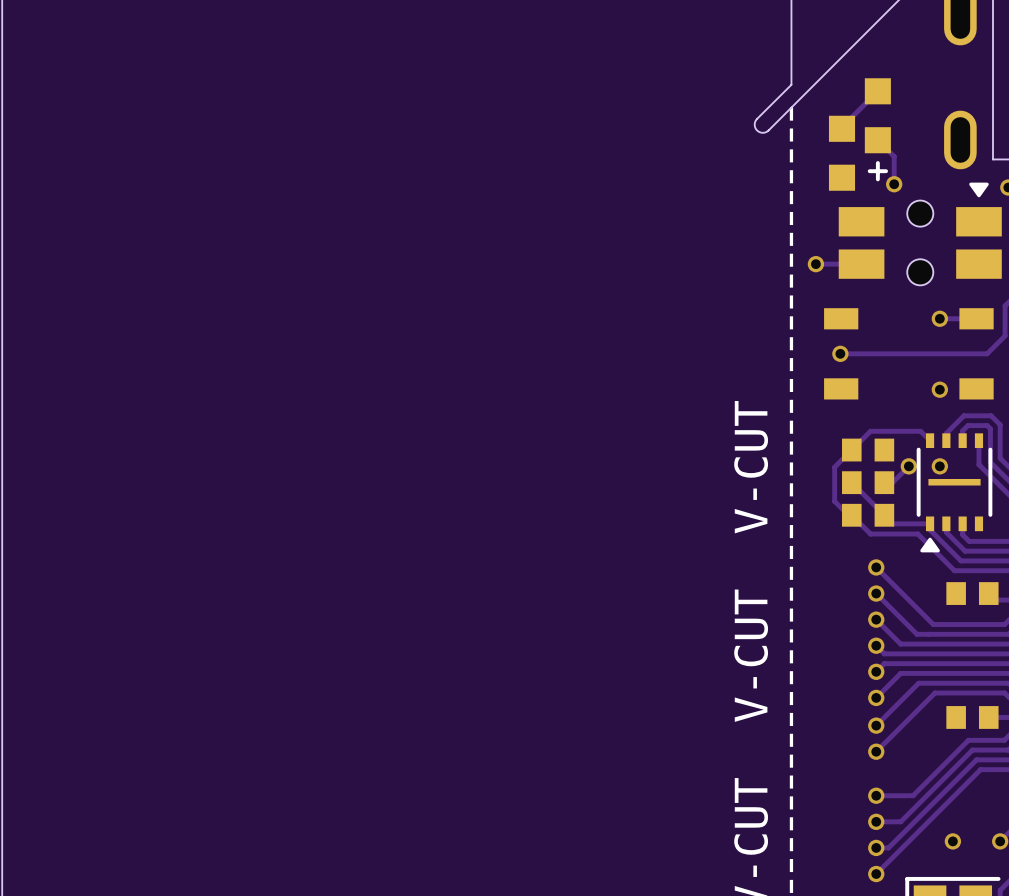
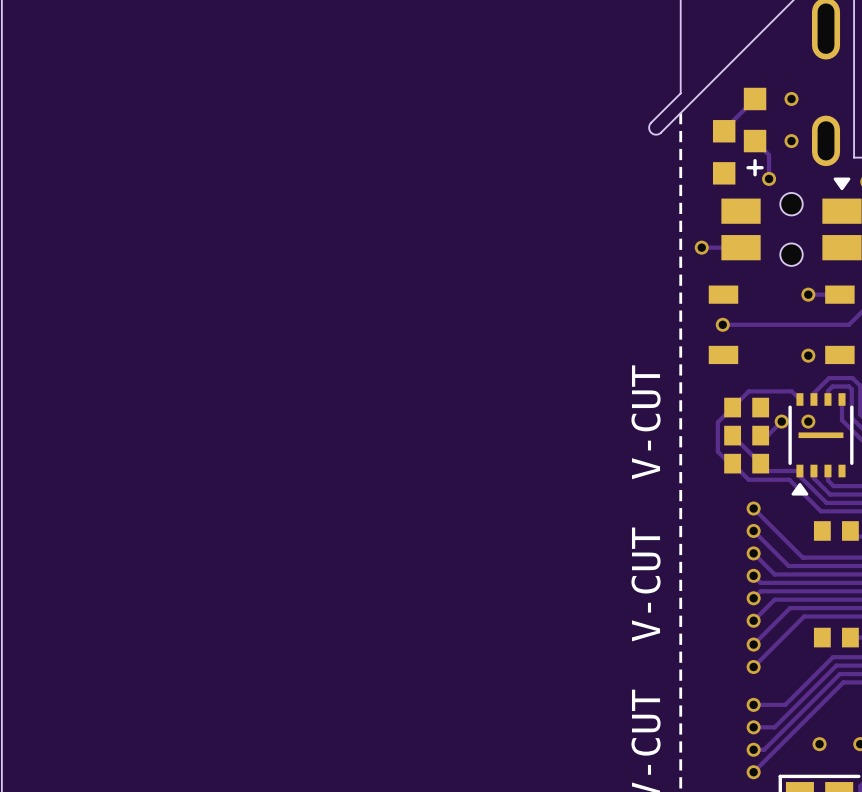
via: none -> (791, 98)
via: none -> (791, 141)

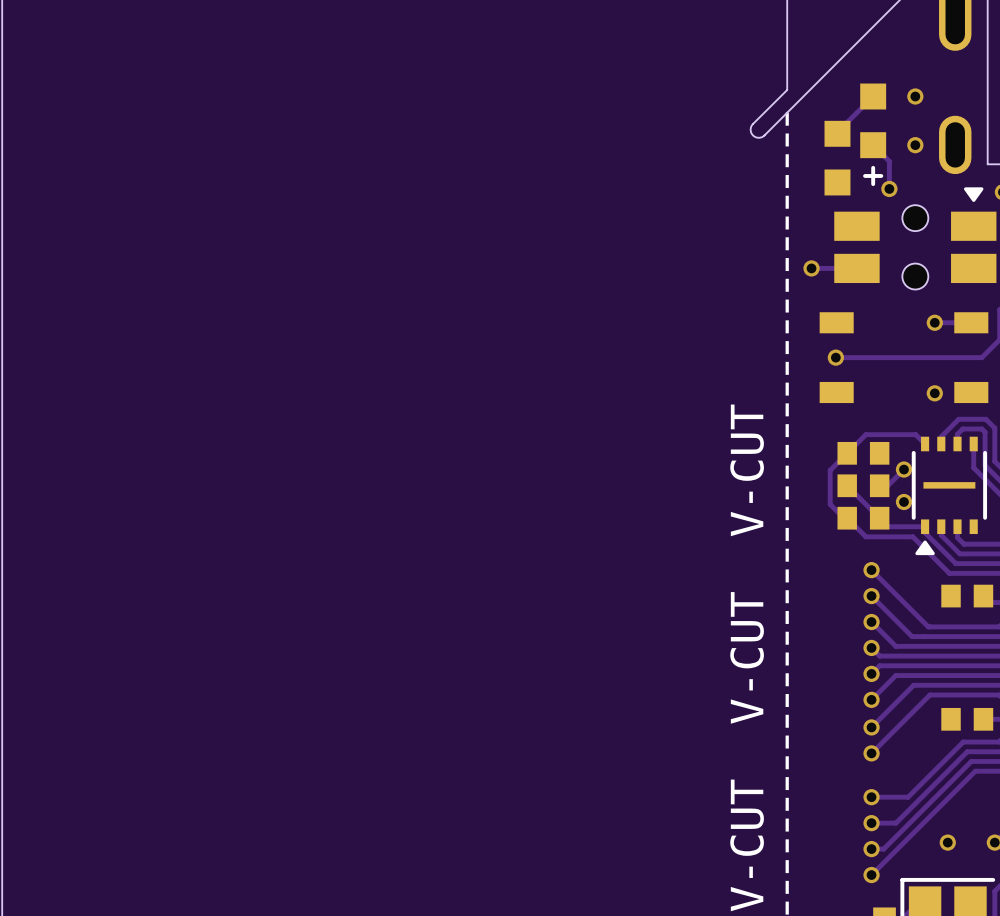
via position: (808, 421) -> (903, 501)

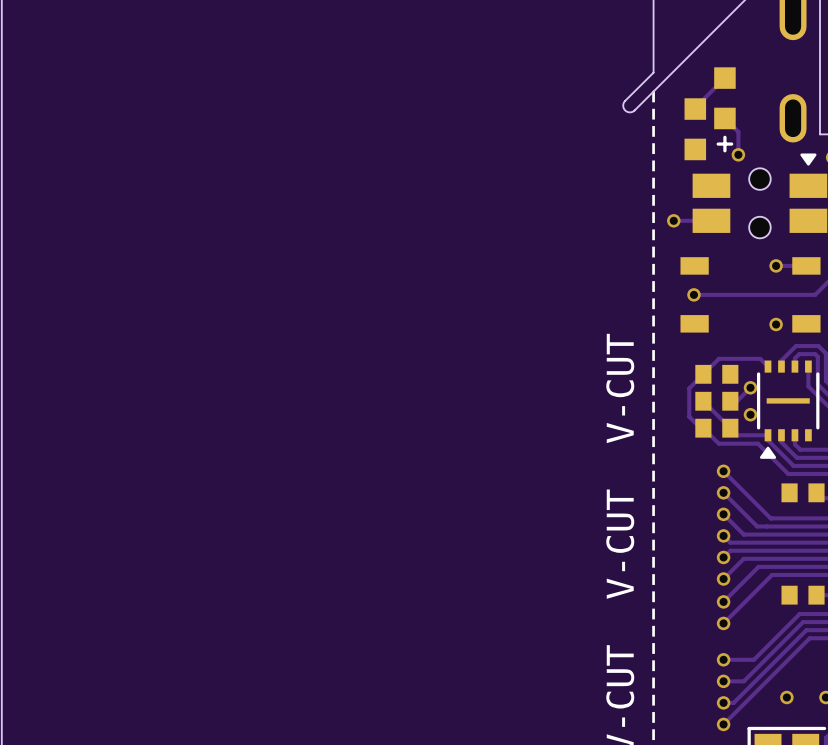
via: (915, 96) -> none
via: (915, 145) -> none

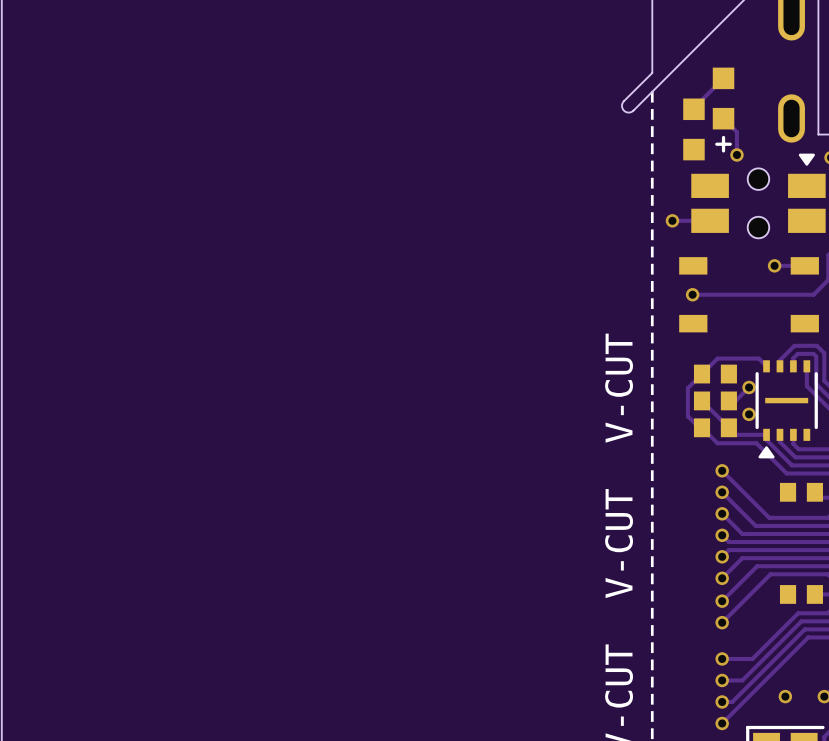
via: (776, 324) -> none

